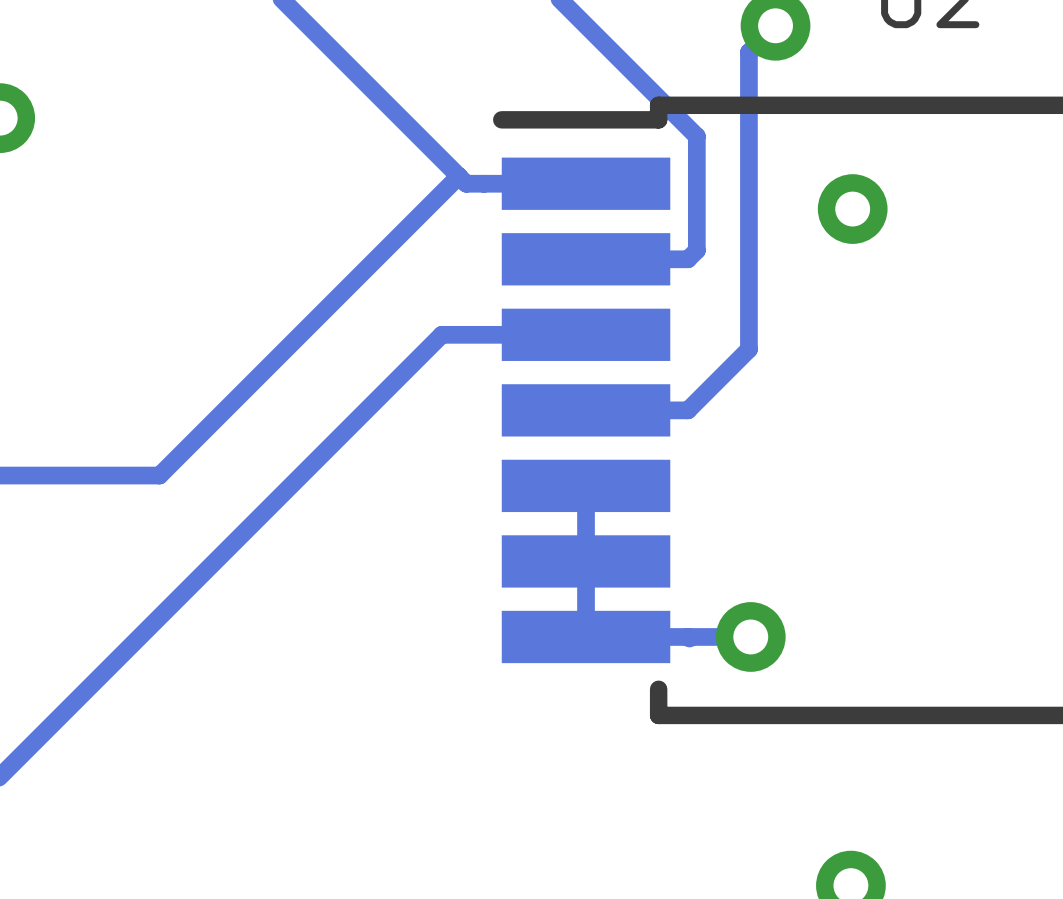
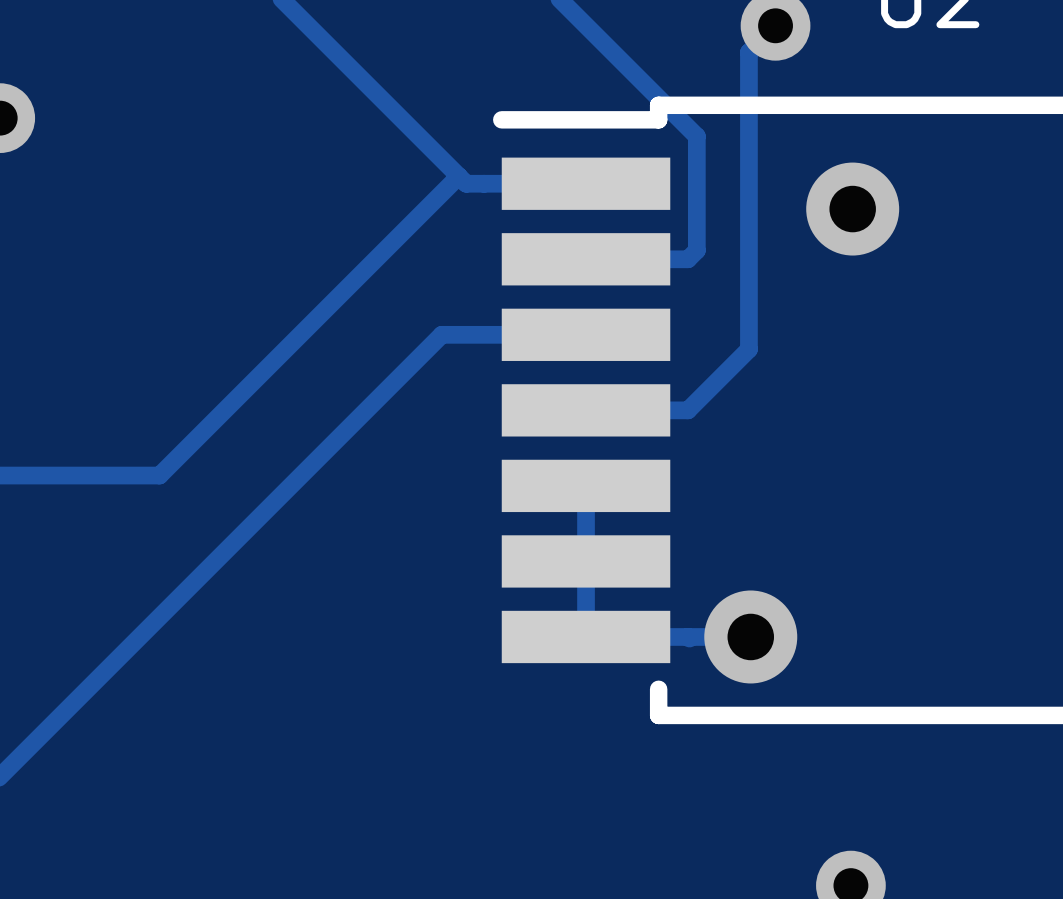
via size: [817, 174, 888, 244] -> [806, 162, 900, 256]
via size: [715, 602, 786, 672] -> [704, 590, 798, 684]

